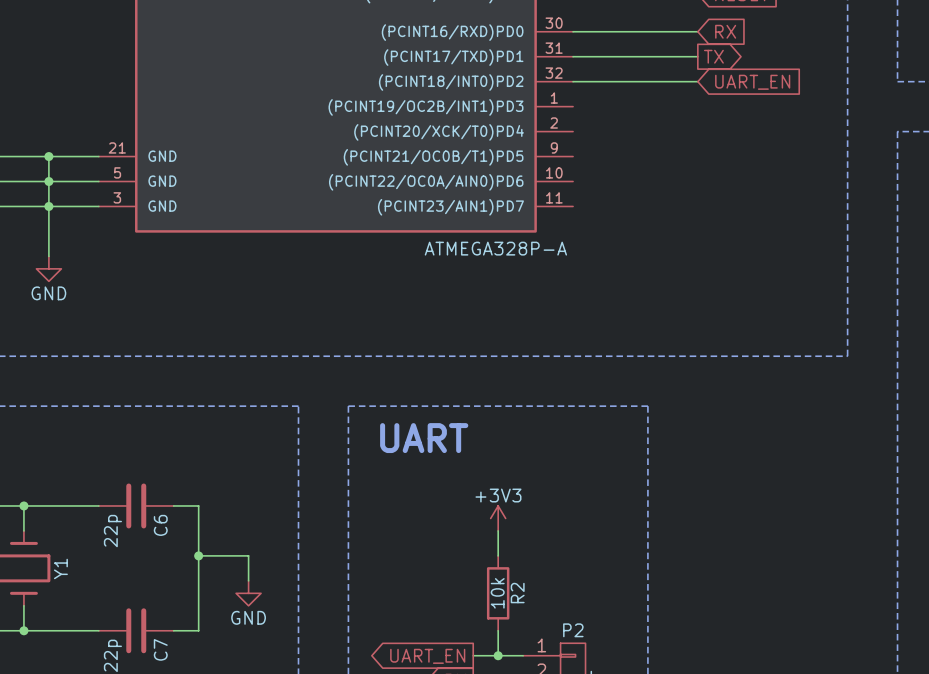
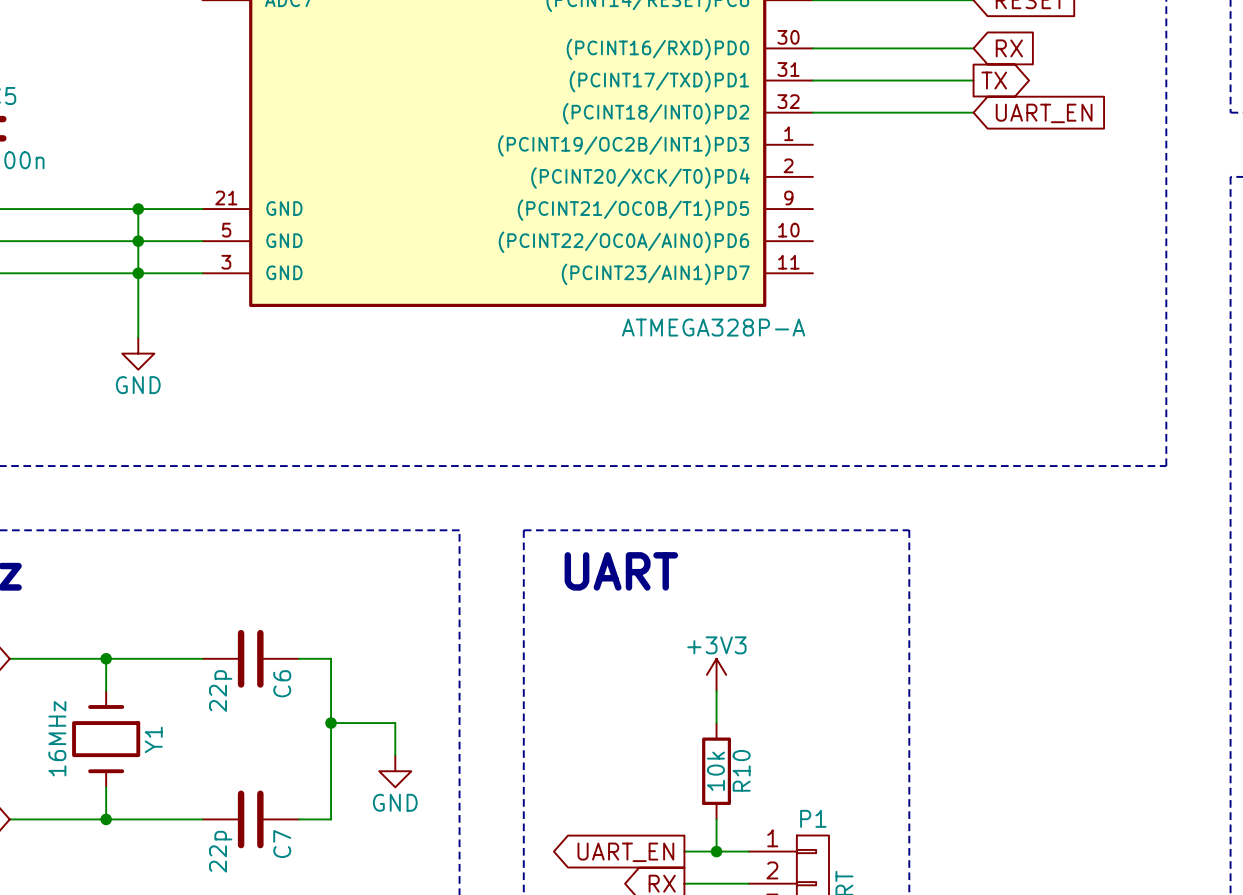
R2 name: R2 (517, 593) -> R10 (741, 770)
P2 name: P2 (573, 630) -> P1 (813, 818)

